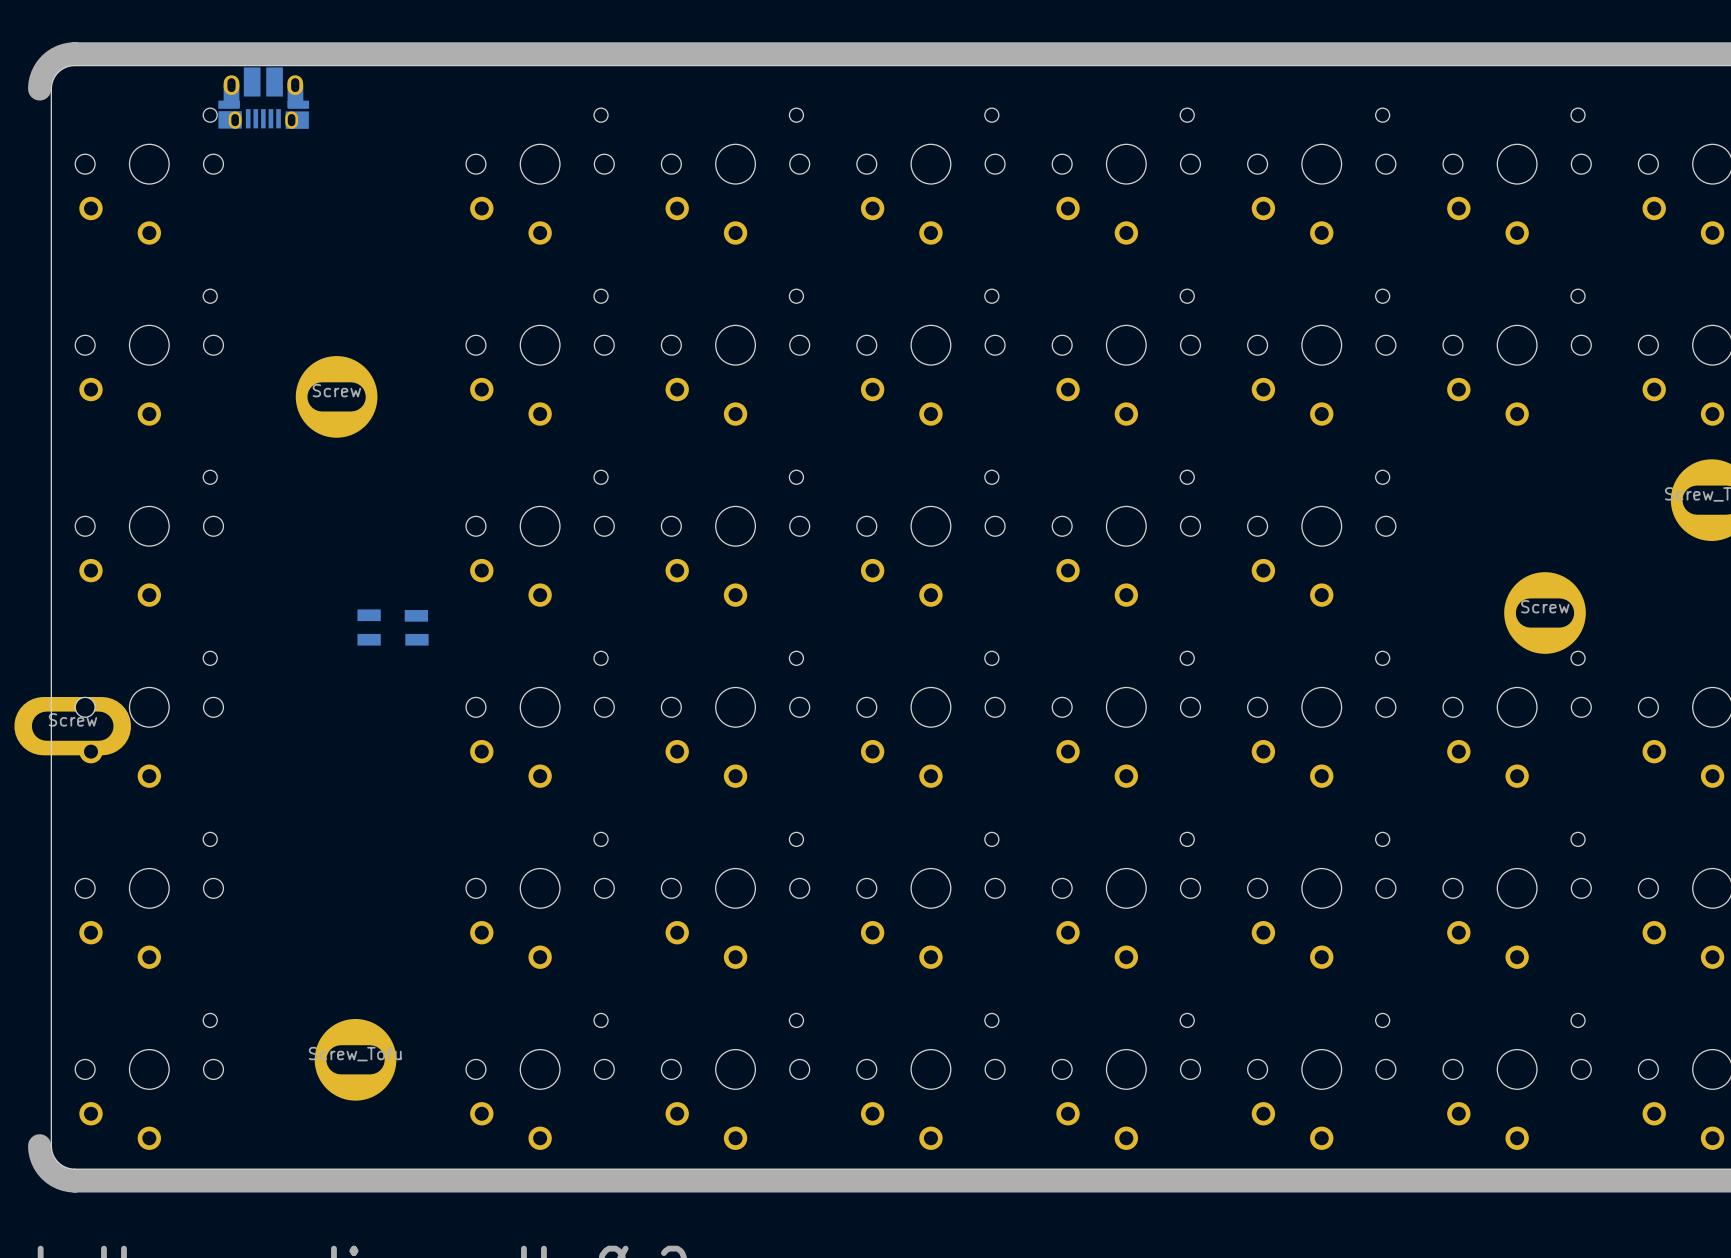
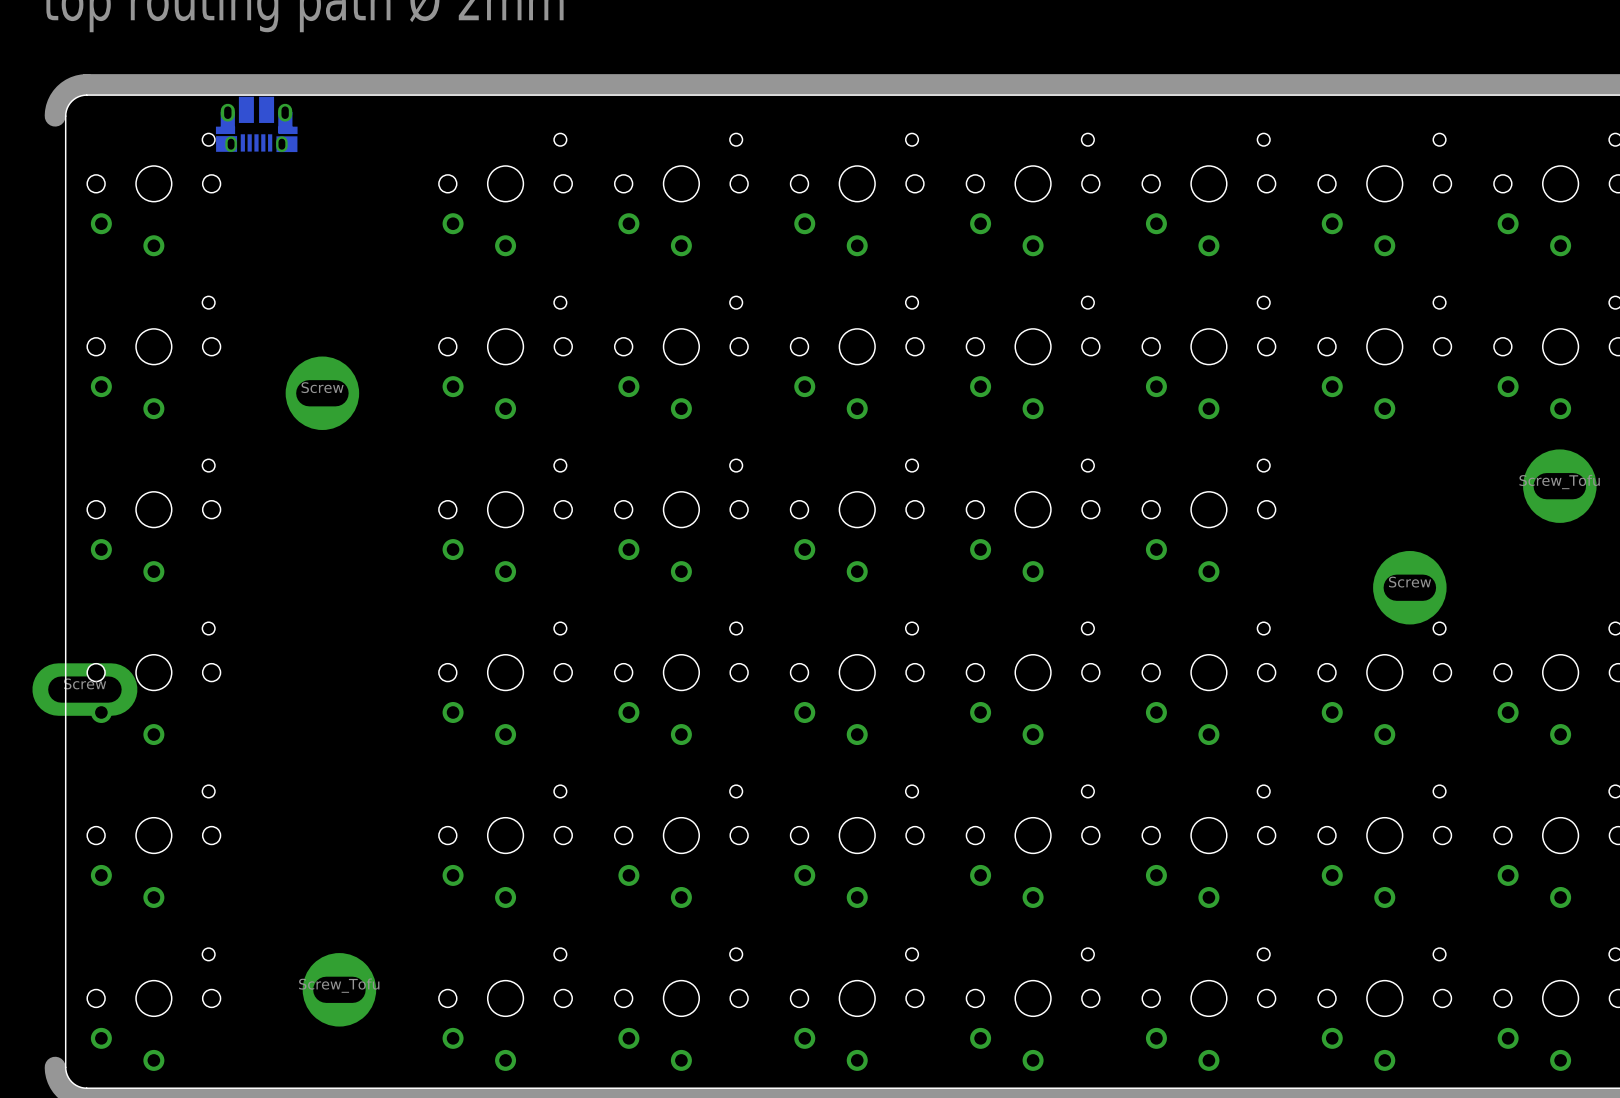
part: (393, 627) -> none

